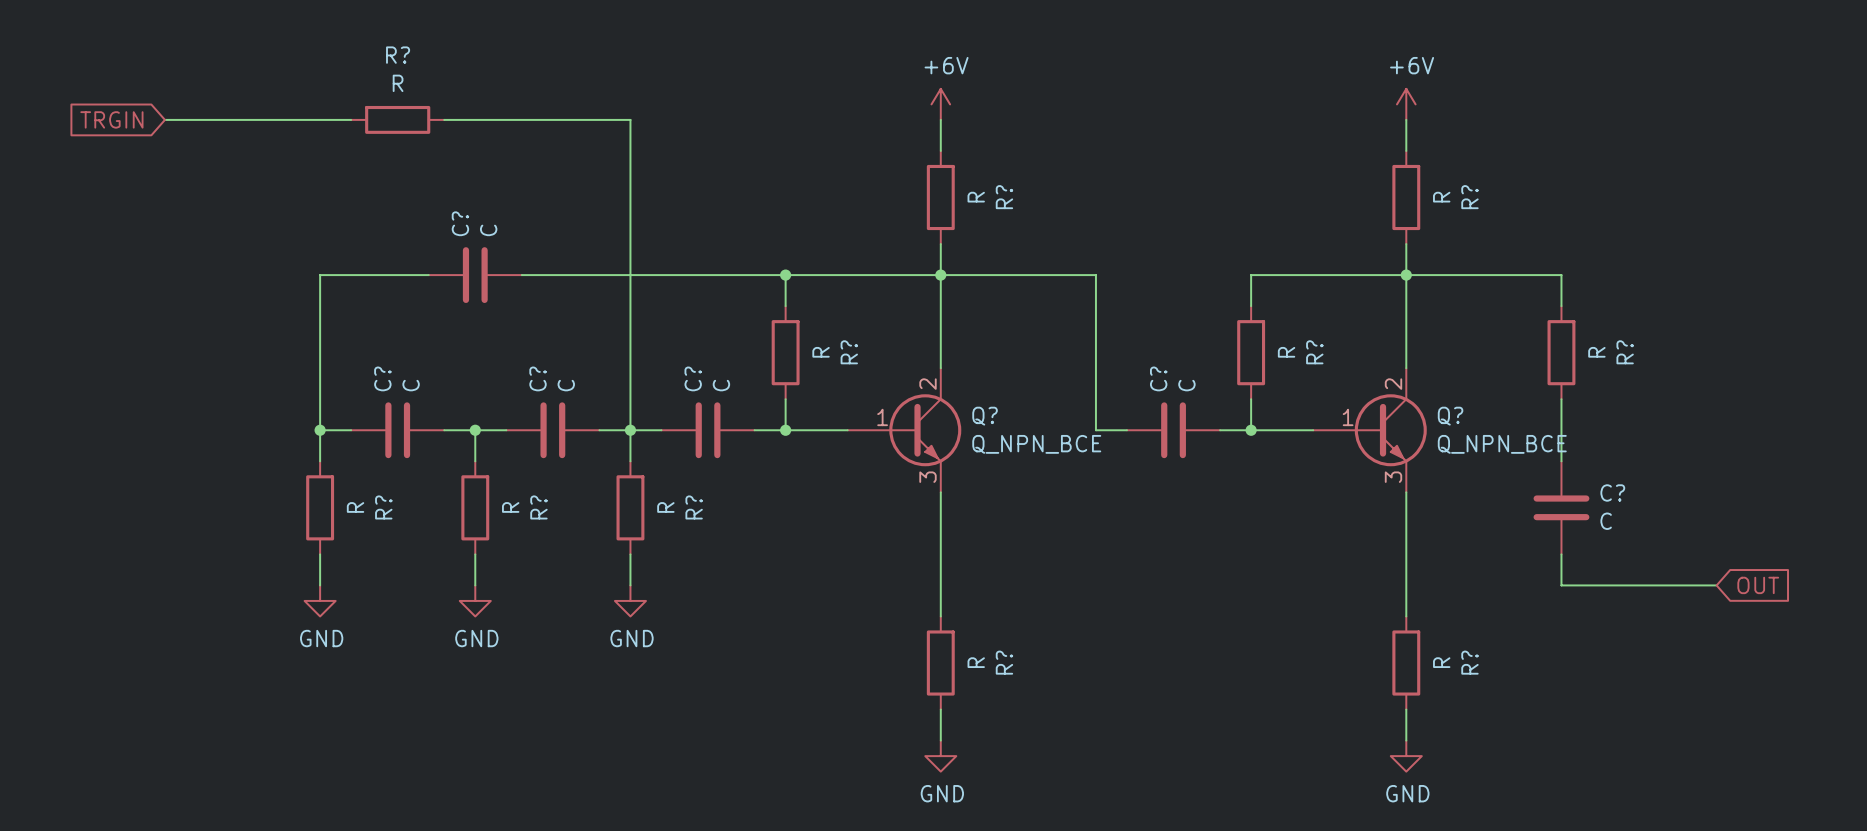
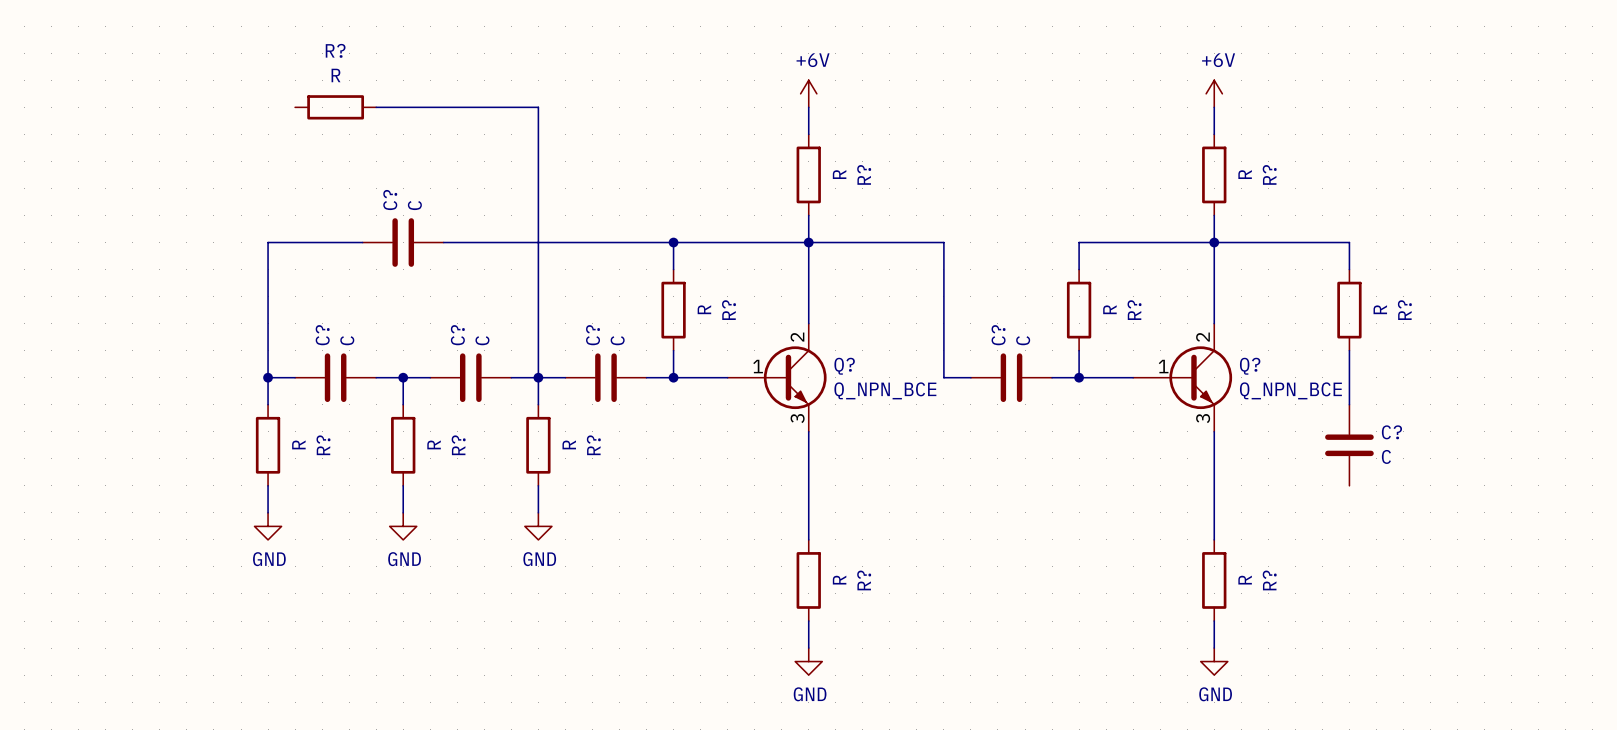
global label: TRGIN (111, 119) -> none
wire: (164, 119) (351, 119) -> none
wire: (1561, 554) (1561, 585) (1716, 585) -> none
global label: OUT (1758, 585) -> none

